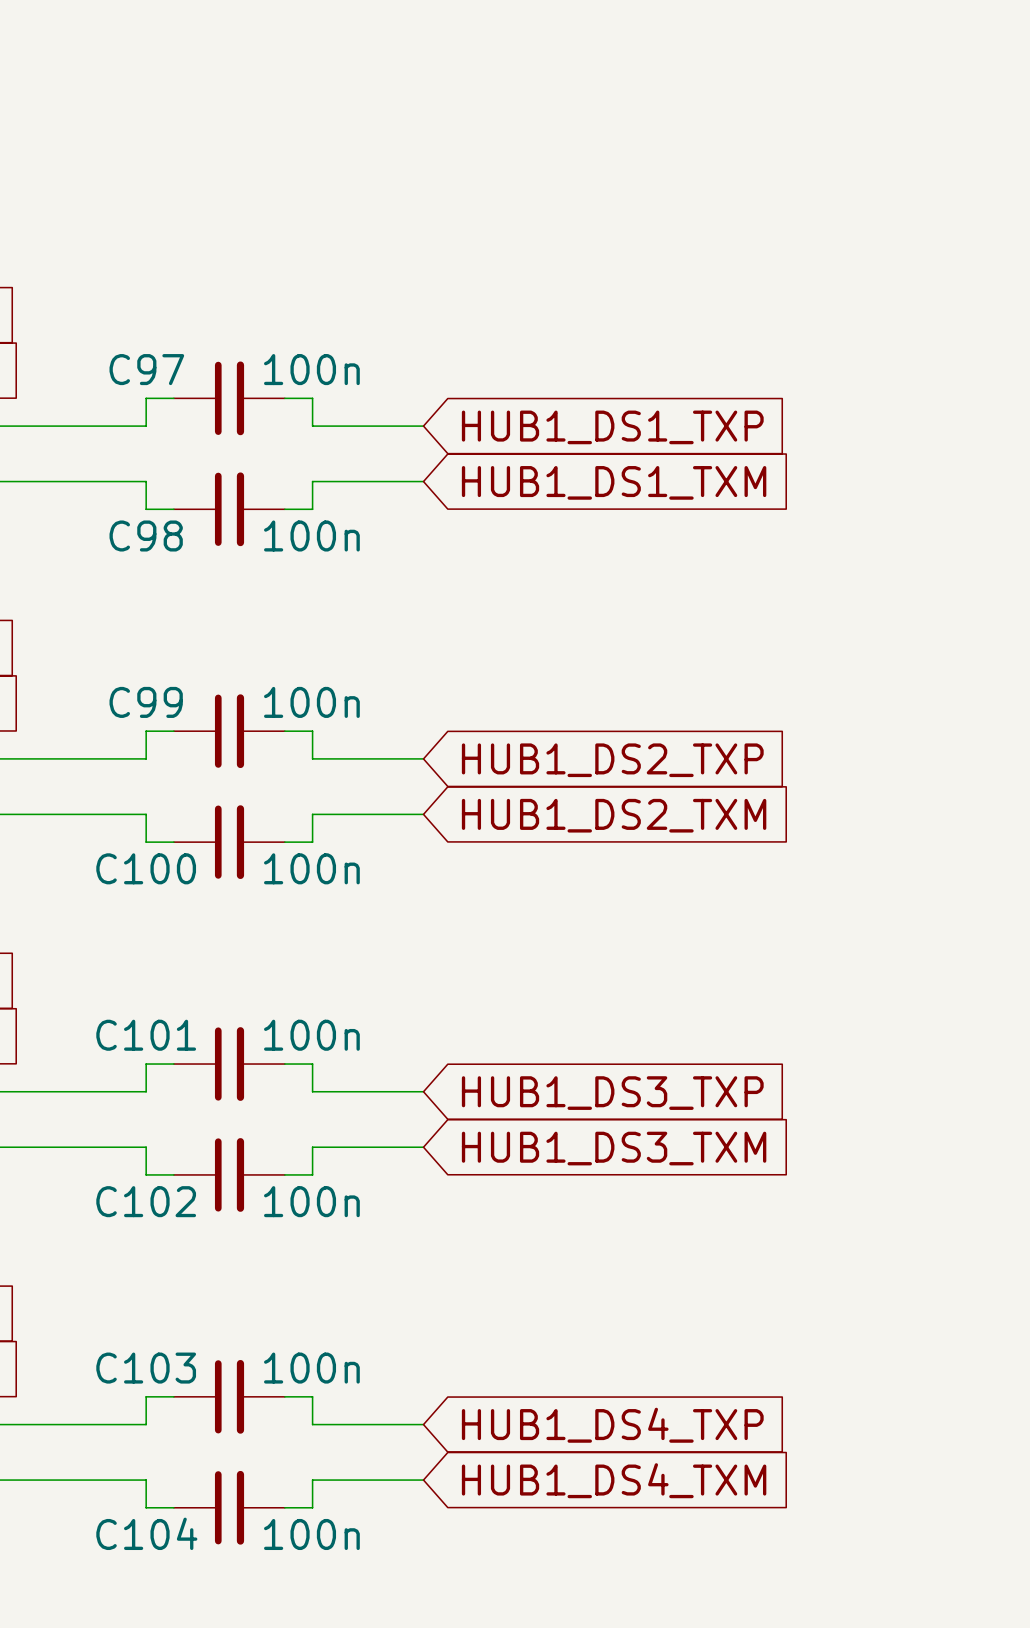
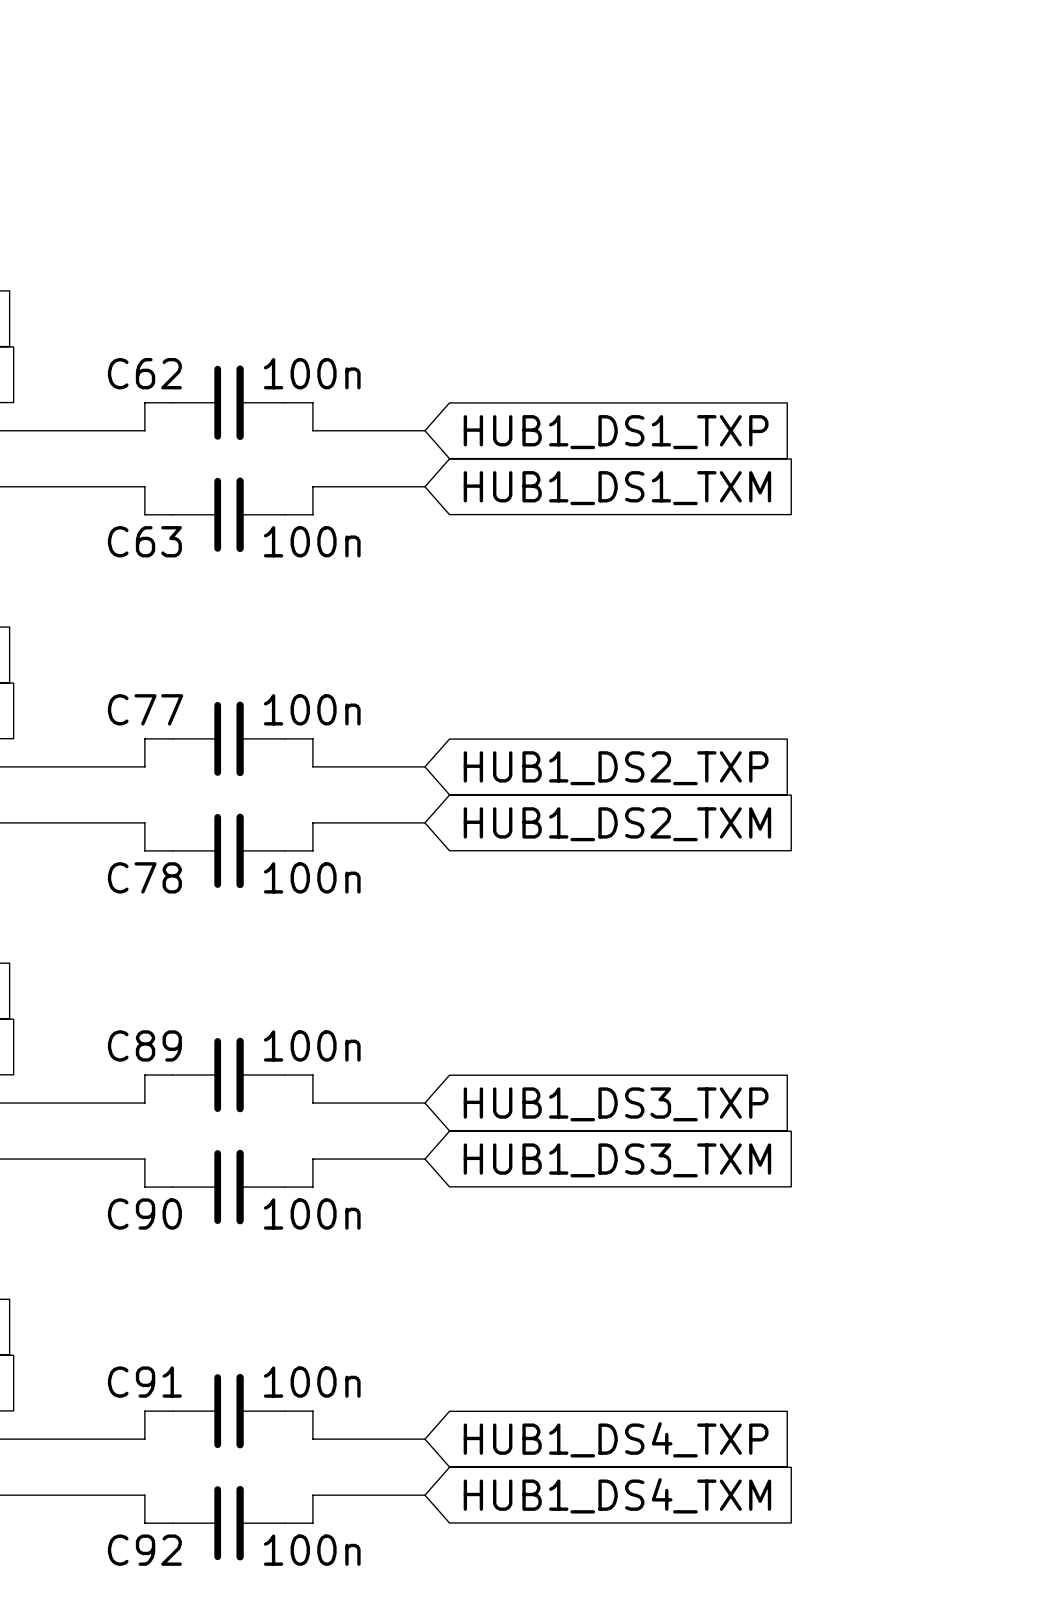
C97 name: C97 (146, 369) -> C62 (144, 373)
C98 name: C98 (146, 535) -> C63 (144, 541)
C99 name: C99 (146, 702) -> C77 (145, 709)
C100 name: C100 (146, 868) -> C78 (144, 877)
C101 name: C101 (146, 1035) -> C89 (144, 1045)
C102 name: C102 (146, 1201) -> C90 (144, 1214)
C103 name: C103 (146, 1368) -> C91 (144, 1382)
C104 name: C104 (146, 1533) -> C92 (144, 1550)

